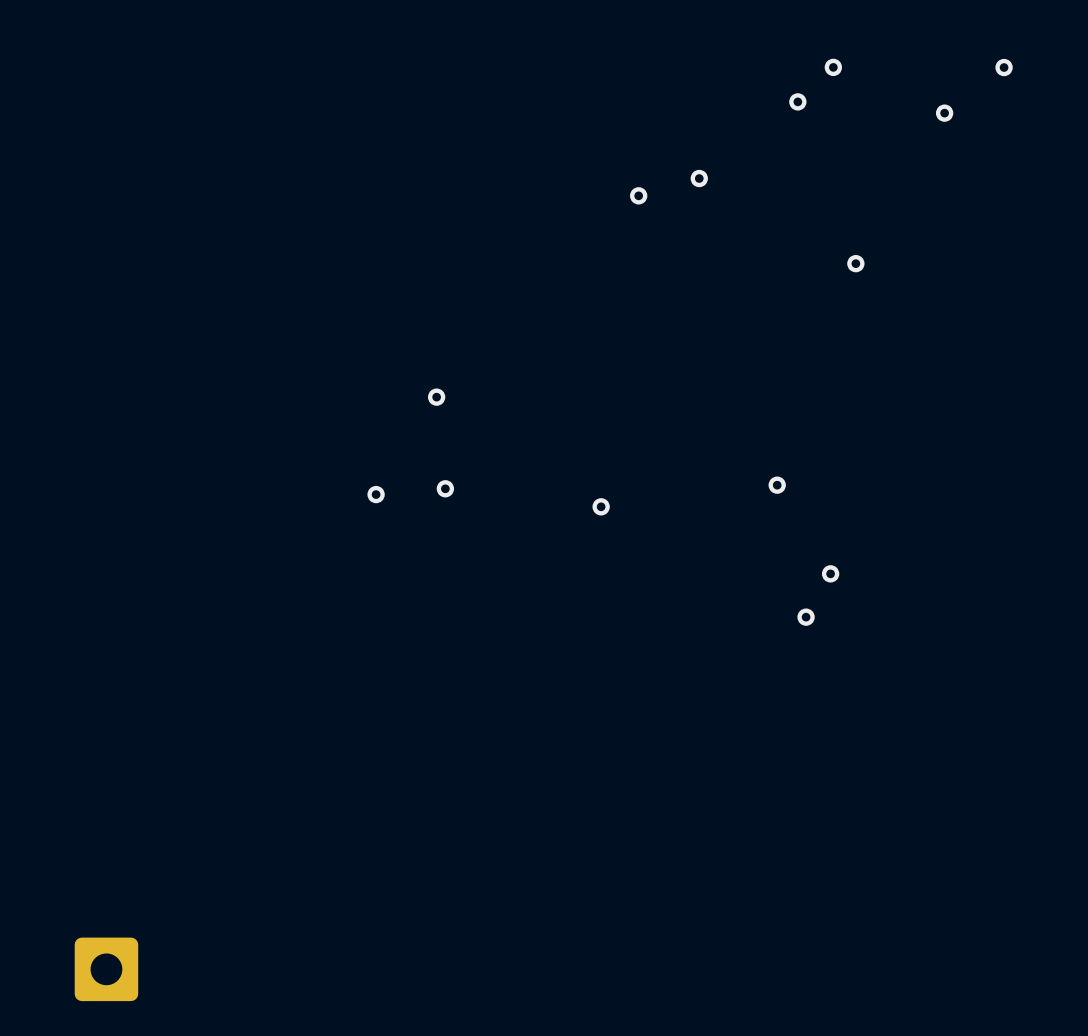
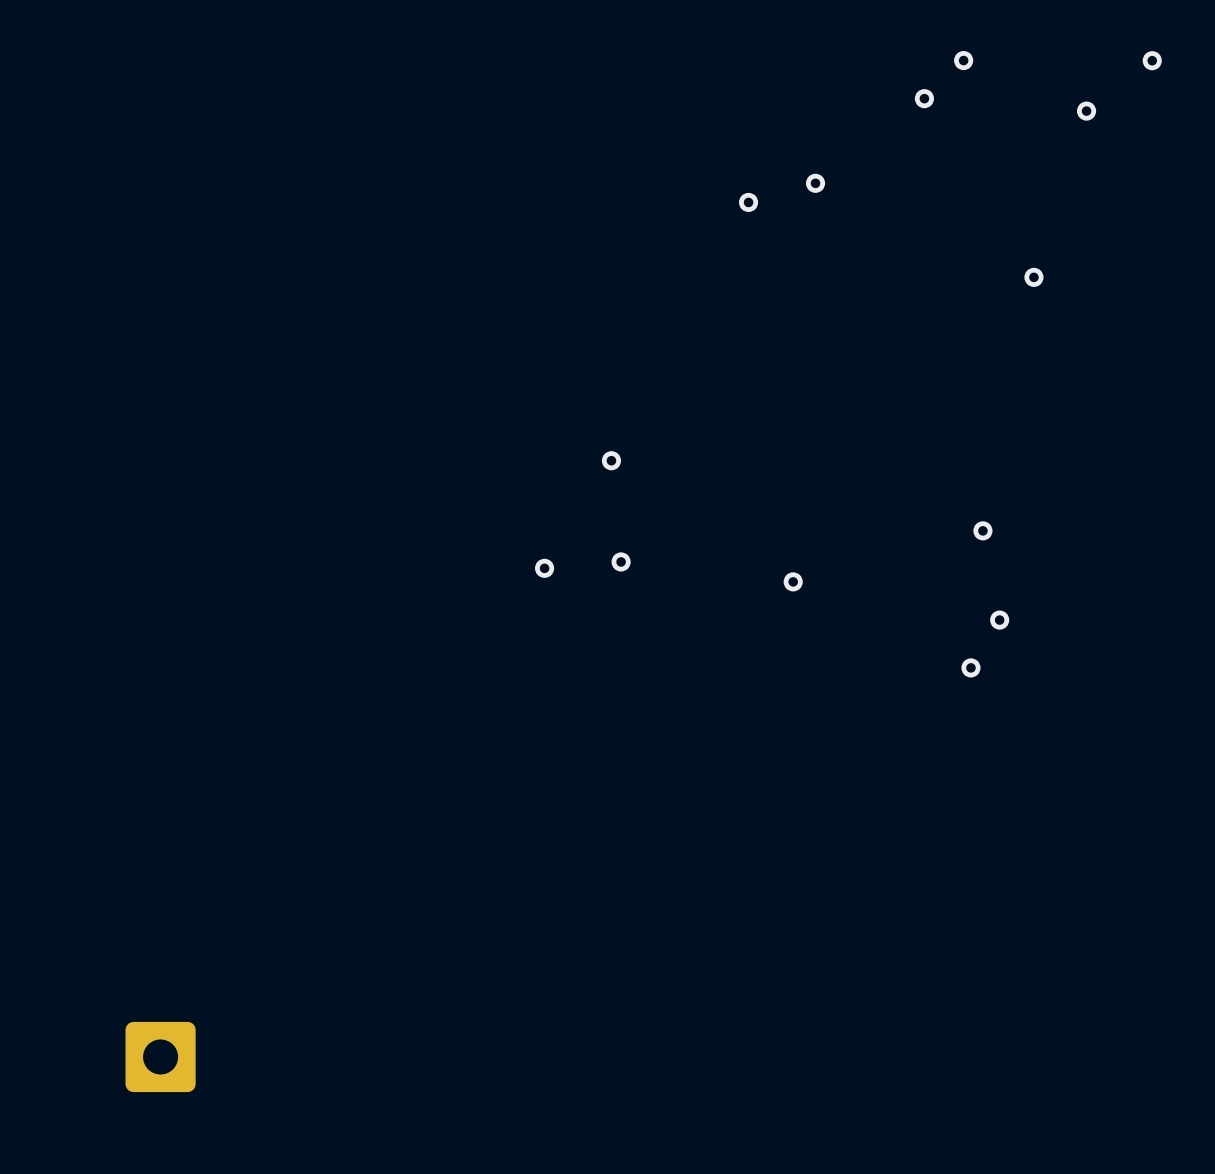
via position: (855, 263) -> (1033, 277)
via: (436, 397) -> none
via: none -> (611, 460)
via: (777, 485) -> none
via position: (445, 488) -> (544, 568)
via: none -> (982, 530)
via: (376, 494) -> none
via: (601, 506) -> none
via: none -> (621, 561)
via: none -> (793, 581)
via: (830, 573) -> none
via: none -> (999, 620)
via: (806, 617) -> none
via: none -> (970, 667)

